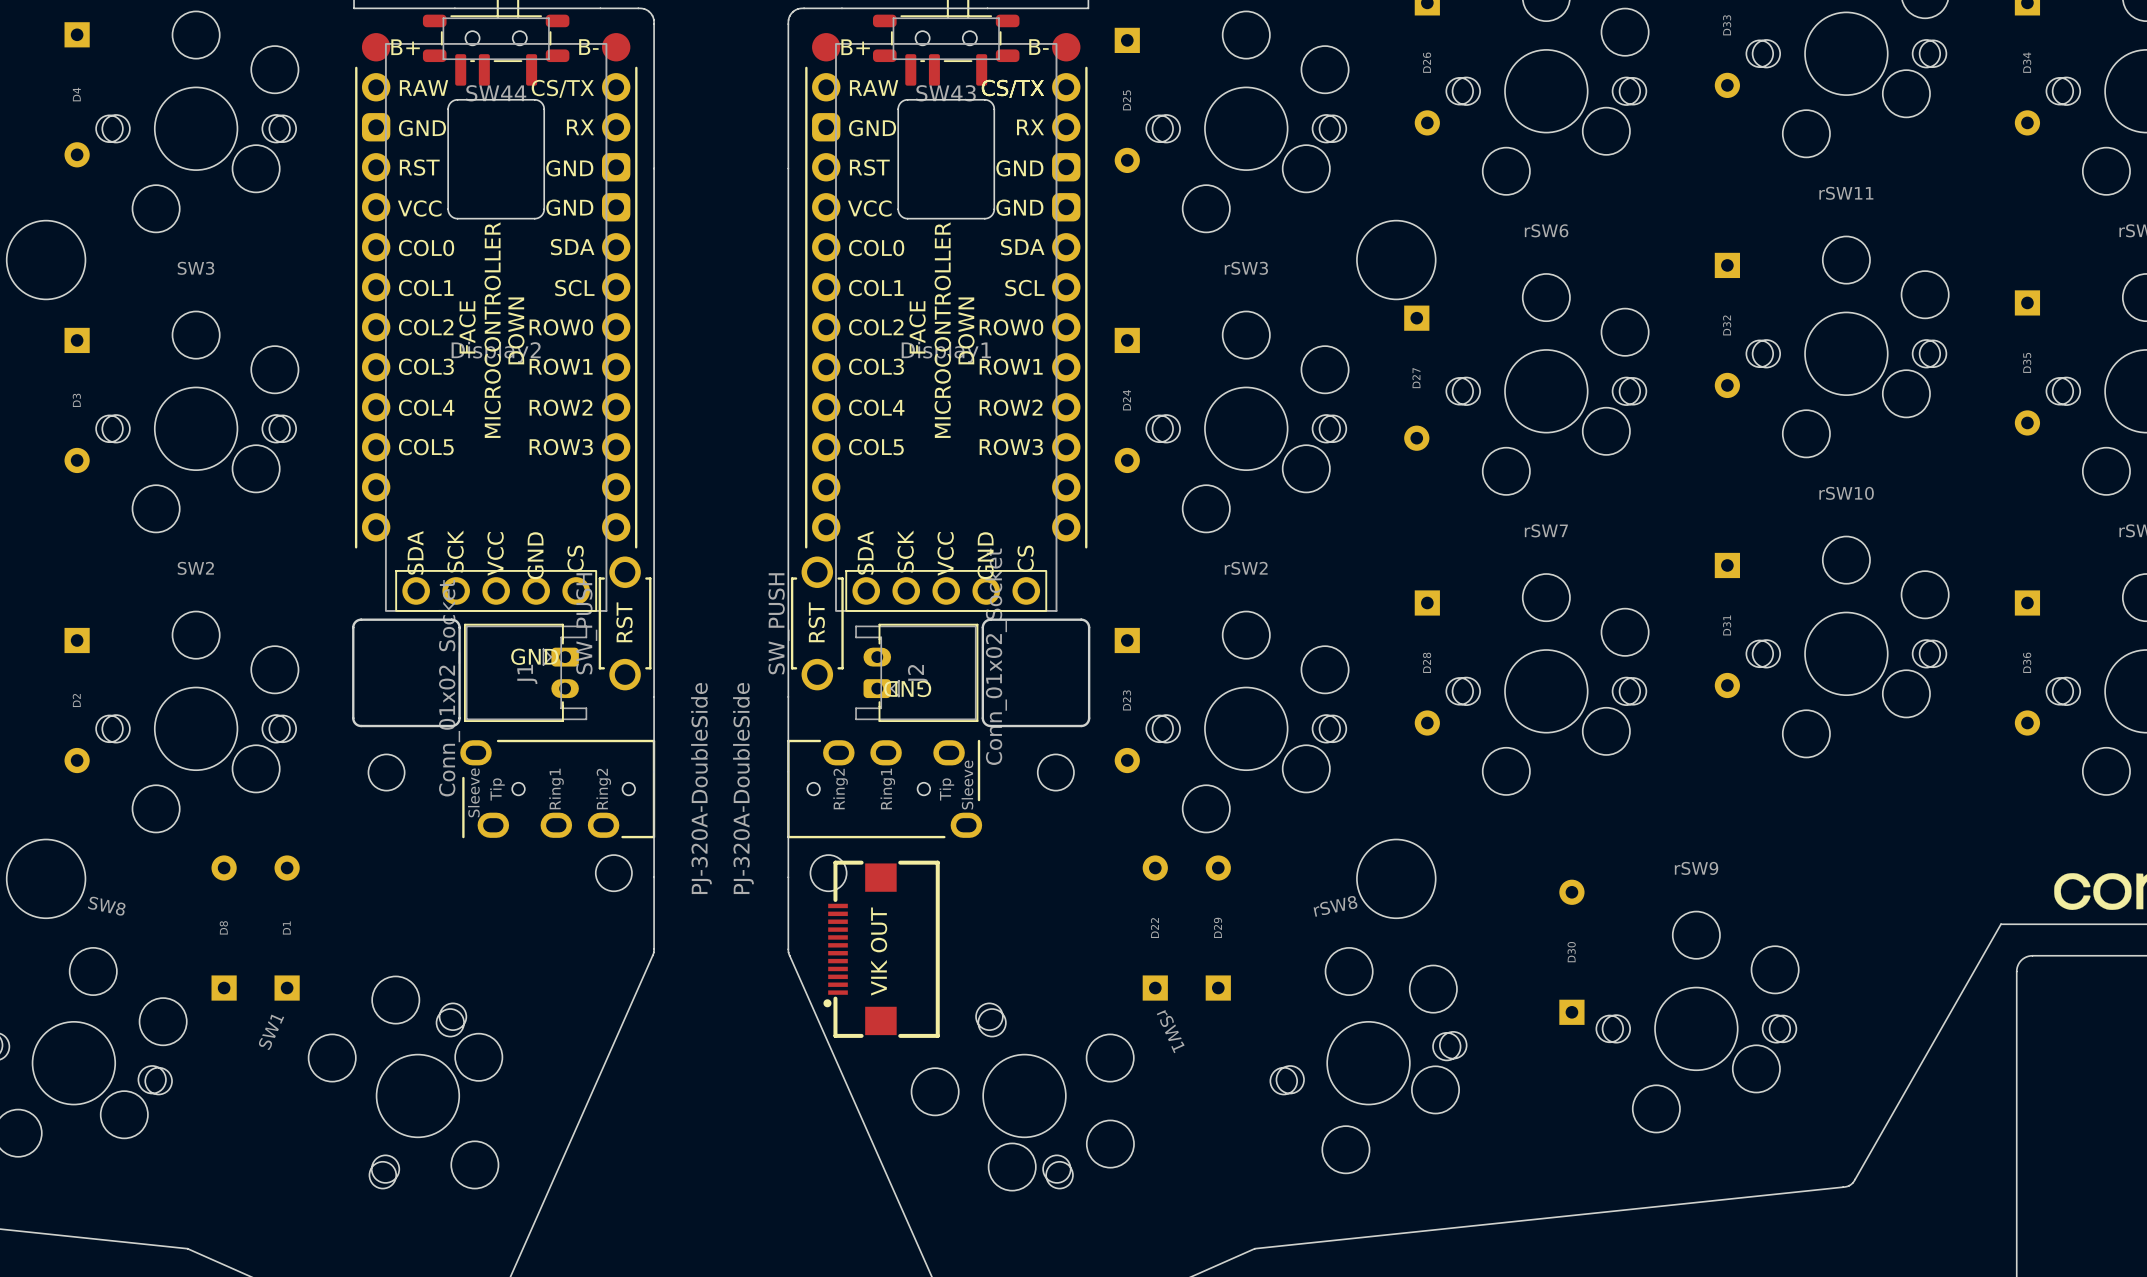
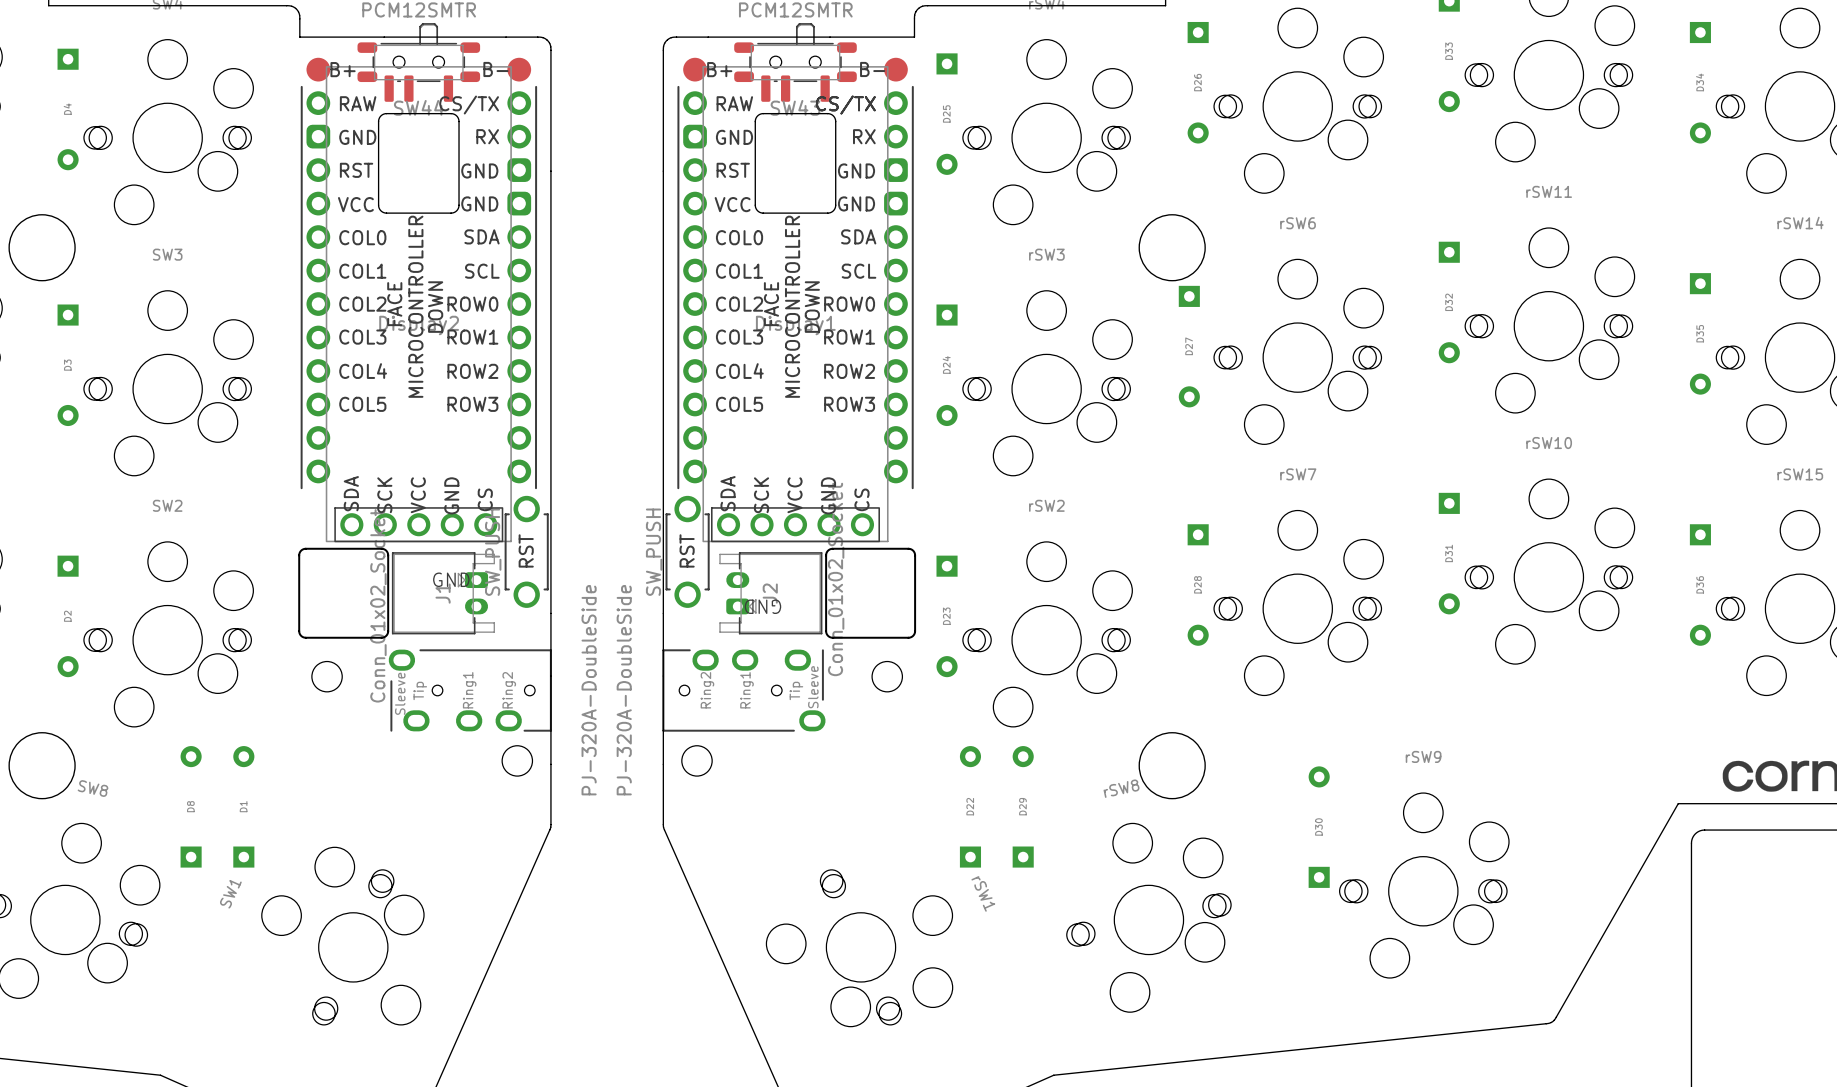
part: (881, 949) -> none

